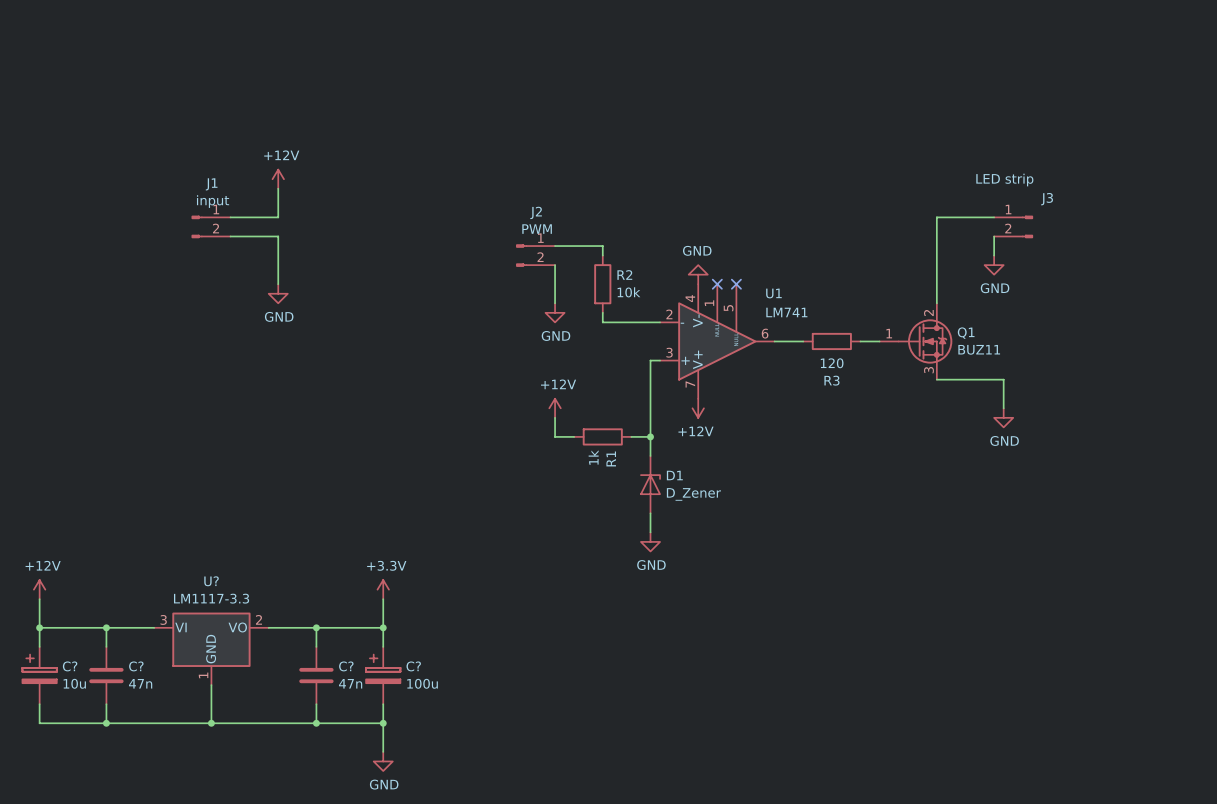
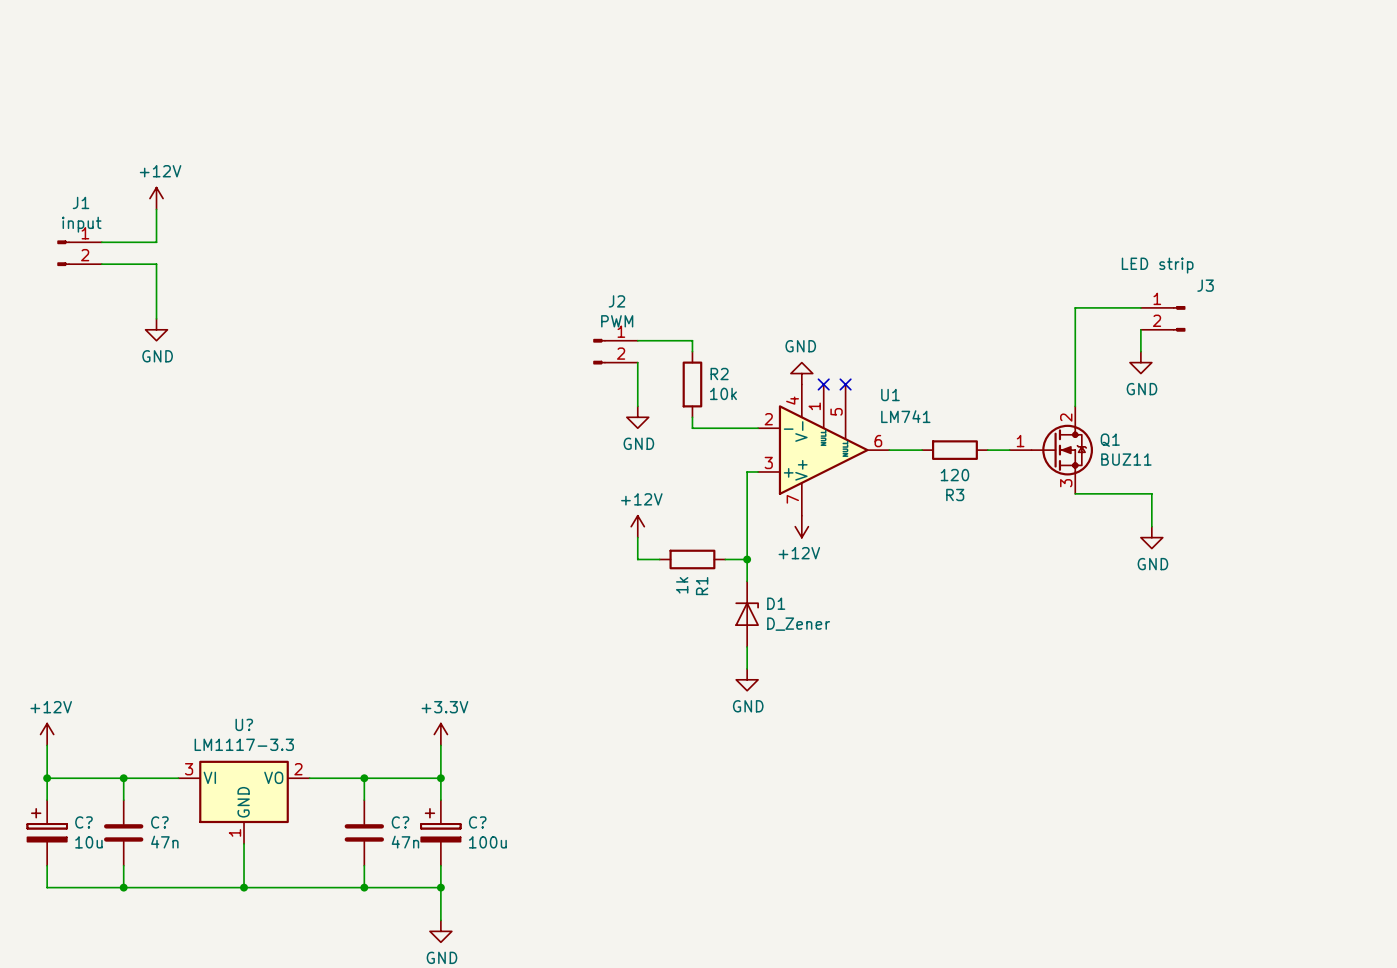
power symbol position: +12V (278, 179) -> +12V (156, 198)
wire: (278, 188) (278, 217) (230, 217) -> (156, 209) (156, 242) (101, 242)
J1 position: (211, 226) -> (79, 253)
wire: (230, 236) (278, 236) (278, 284) -> (101, 264) (156, 264) (156, 318)
power symbol position: GND (278, 293) -> GND (156, 329)

